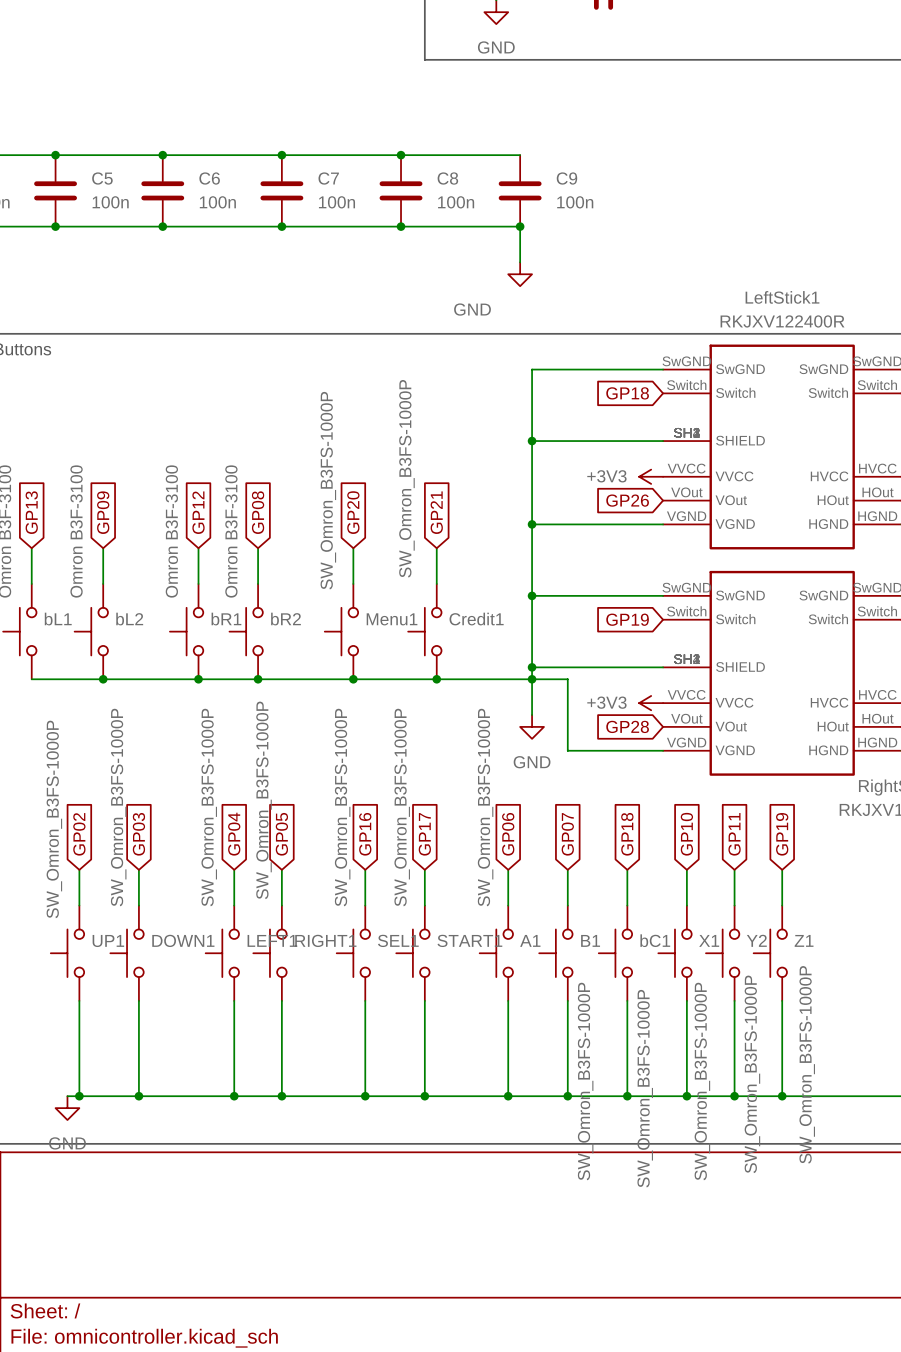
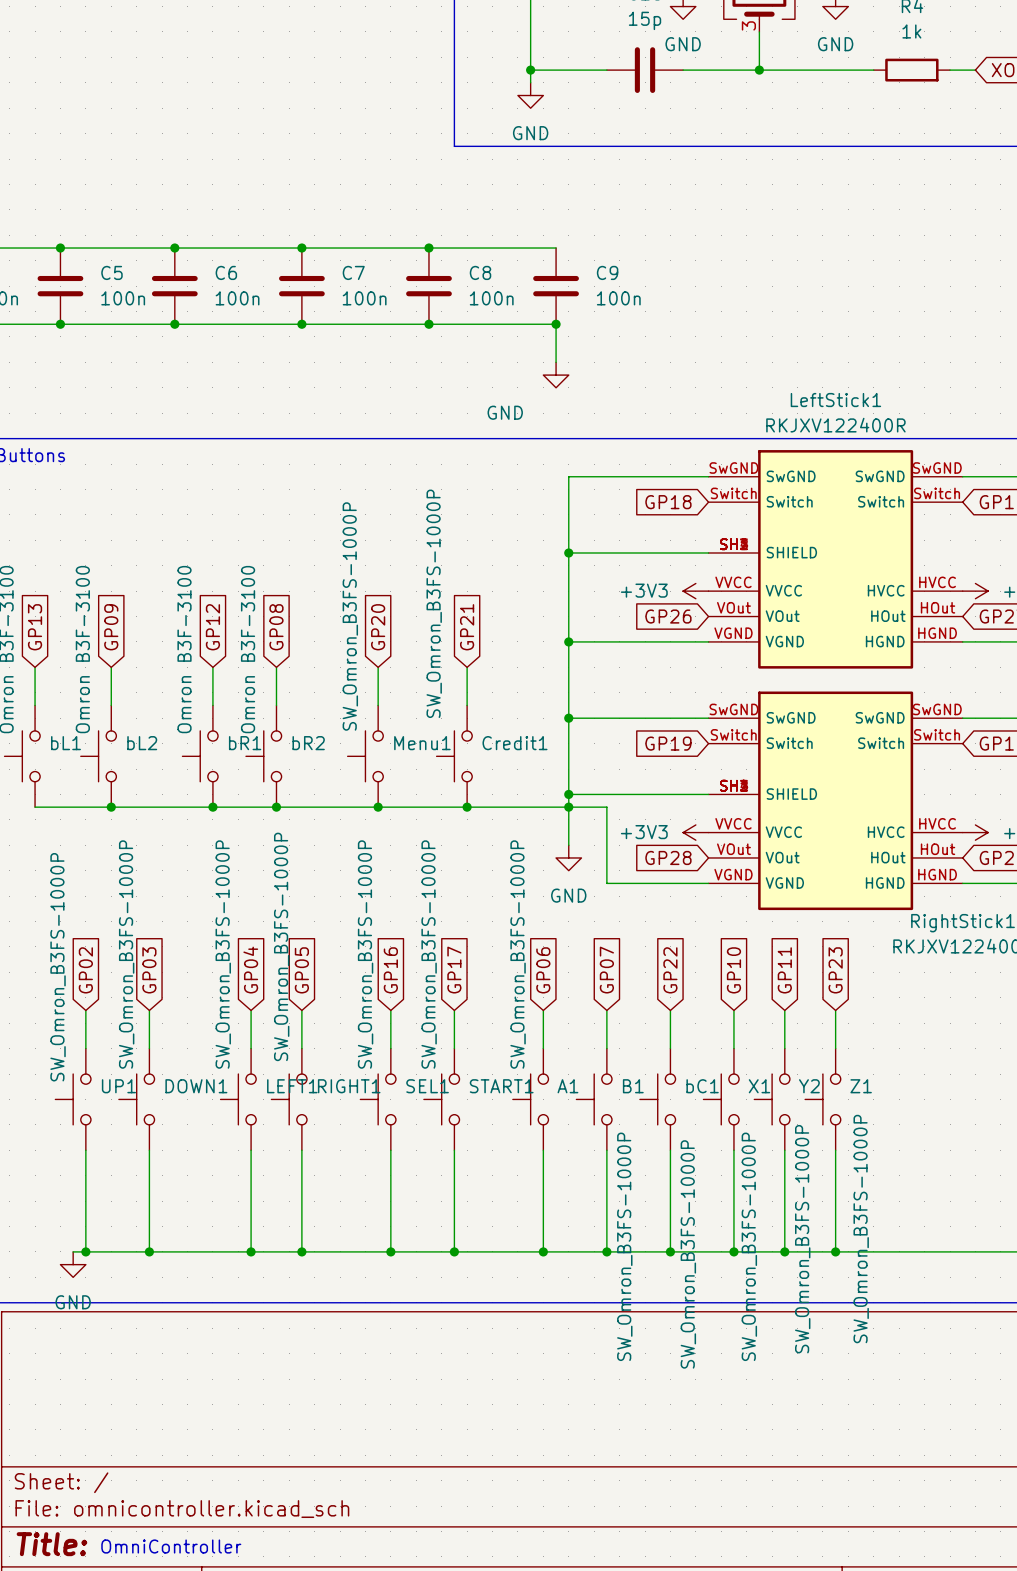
global label: GP18 (627, 834) -> GP22 (670, 970)
global label: GP19 (782, 834) -> GP23 (835, 970)

